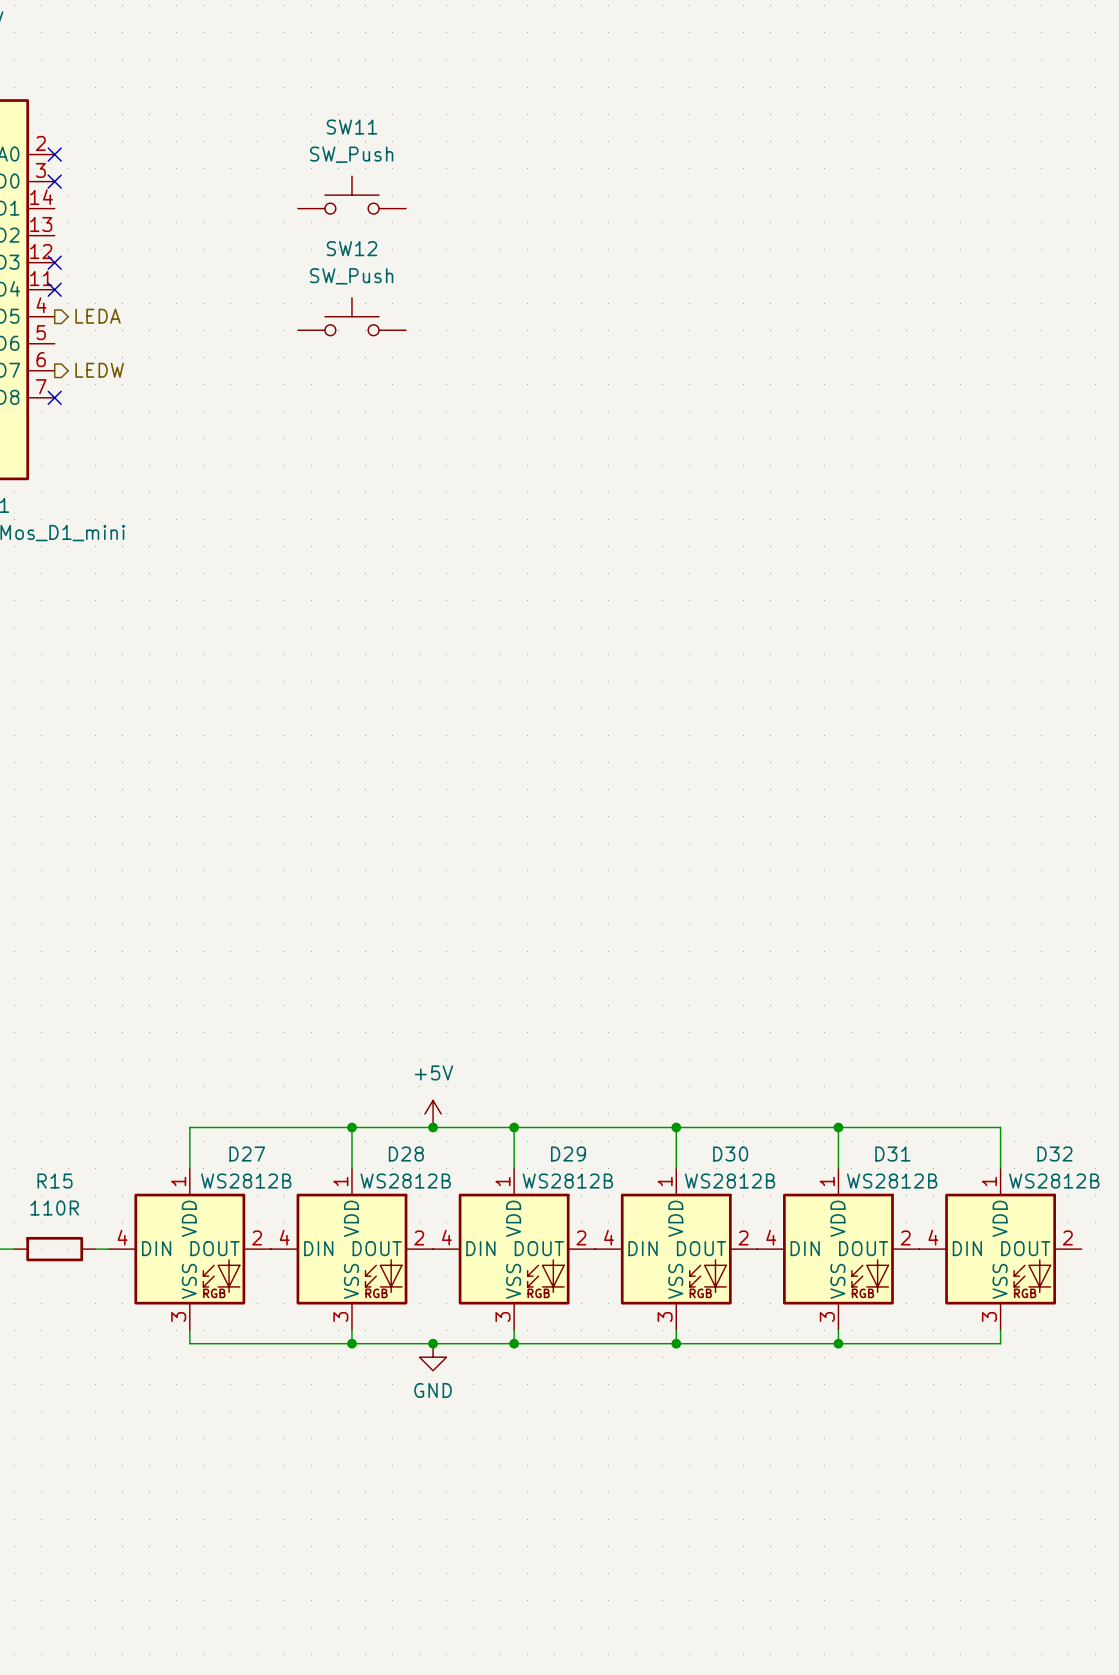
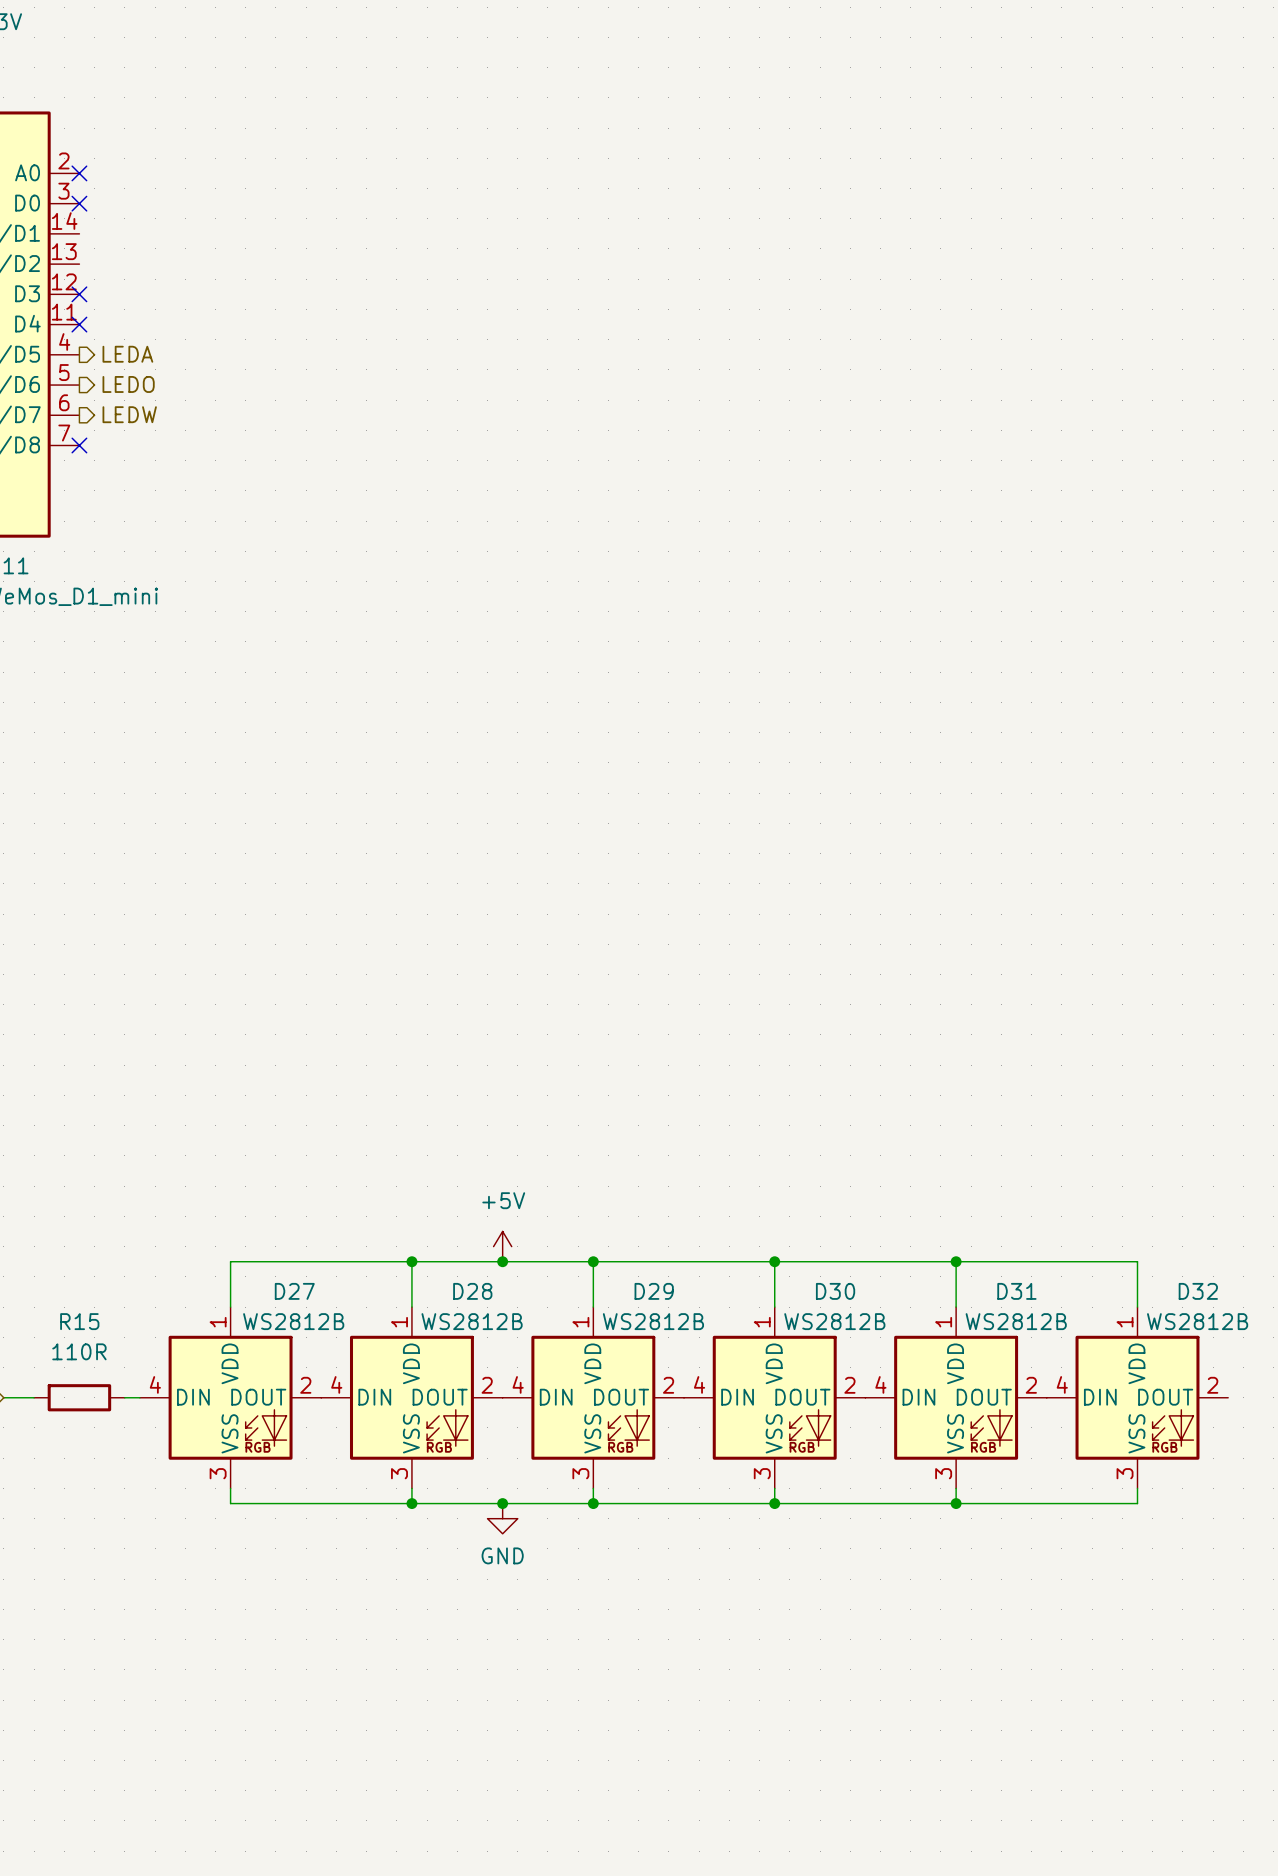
SW11: SW_Push (351, 195) -> none
SW12: SW_Push (351, 316) -> none
hierarchical label: none -> LEDO (128, 384)

